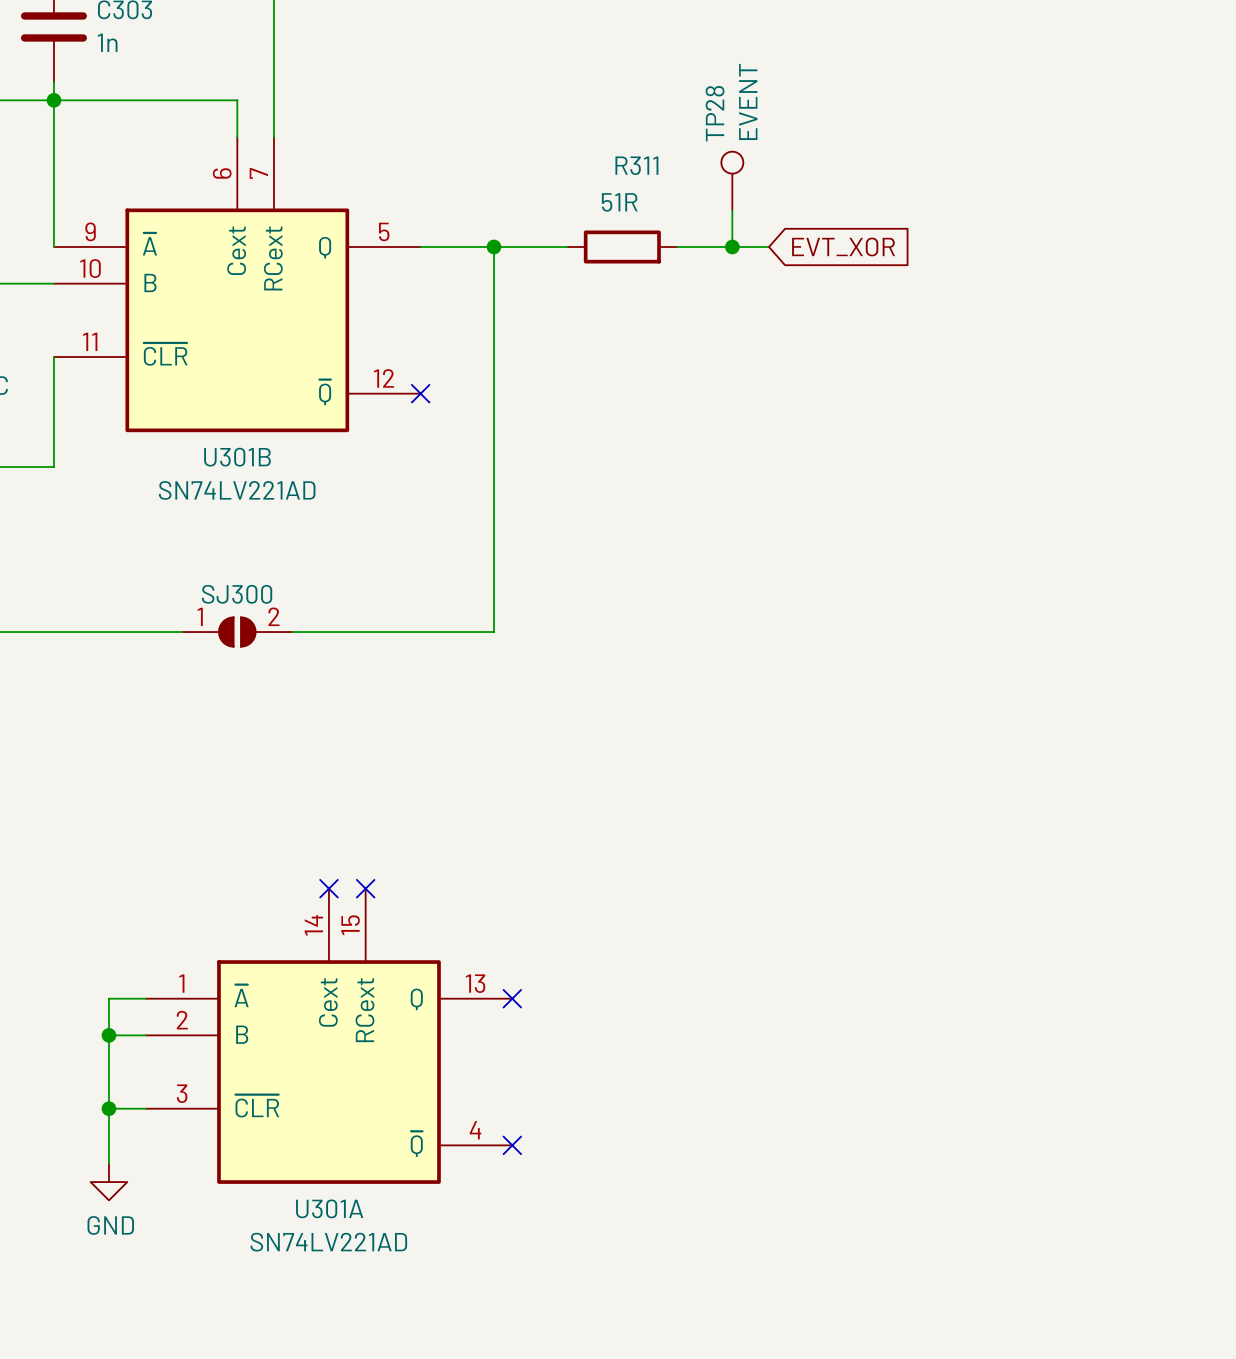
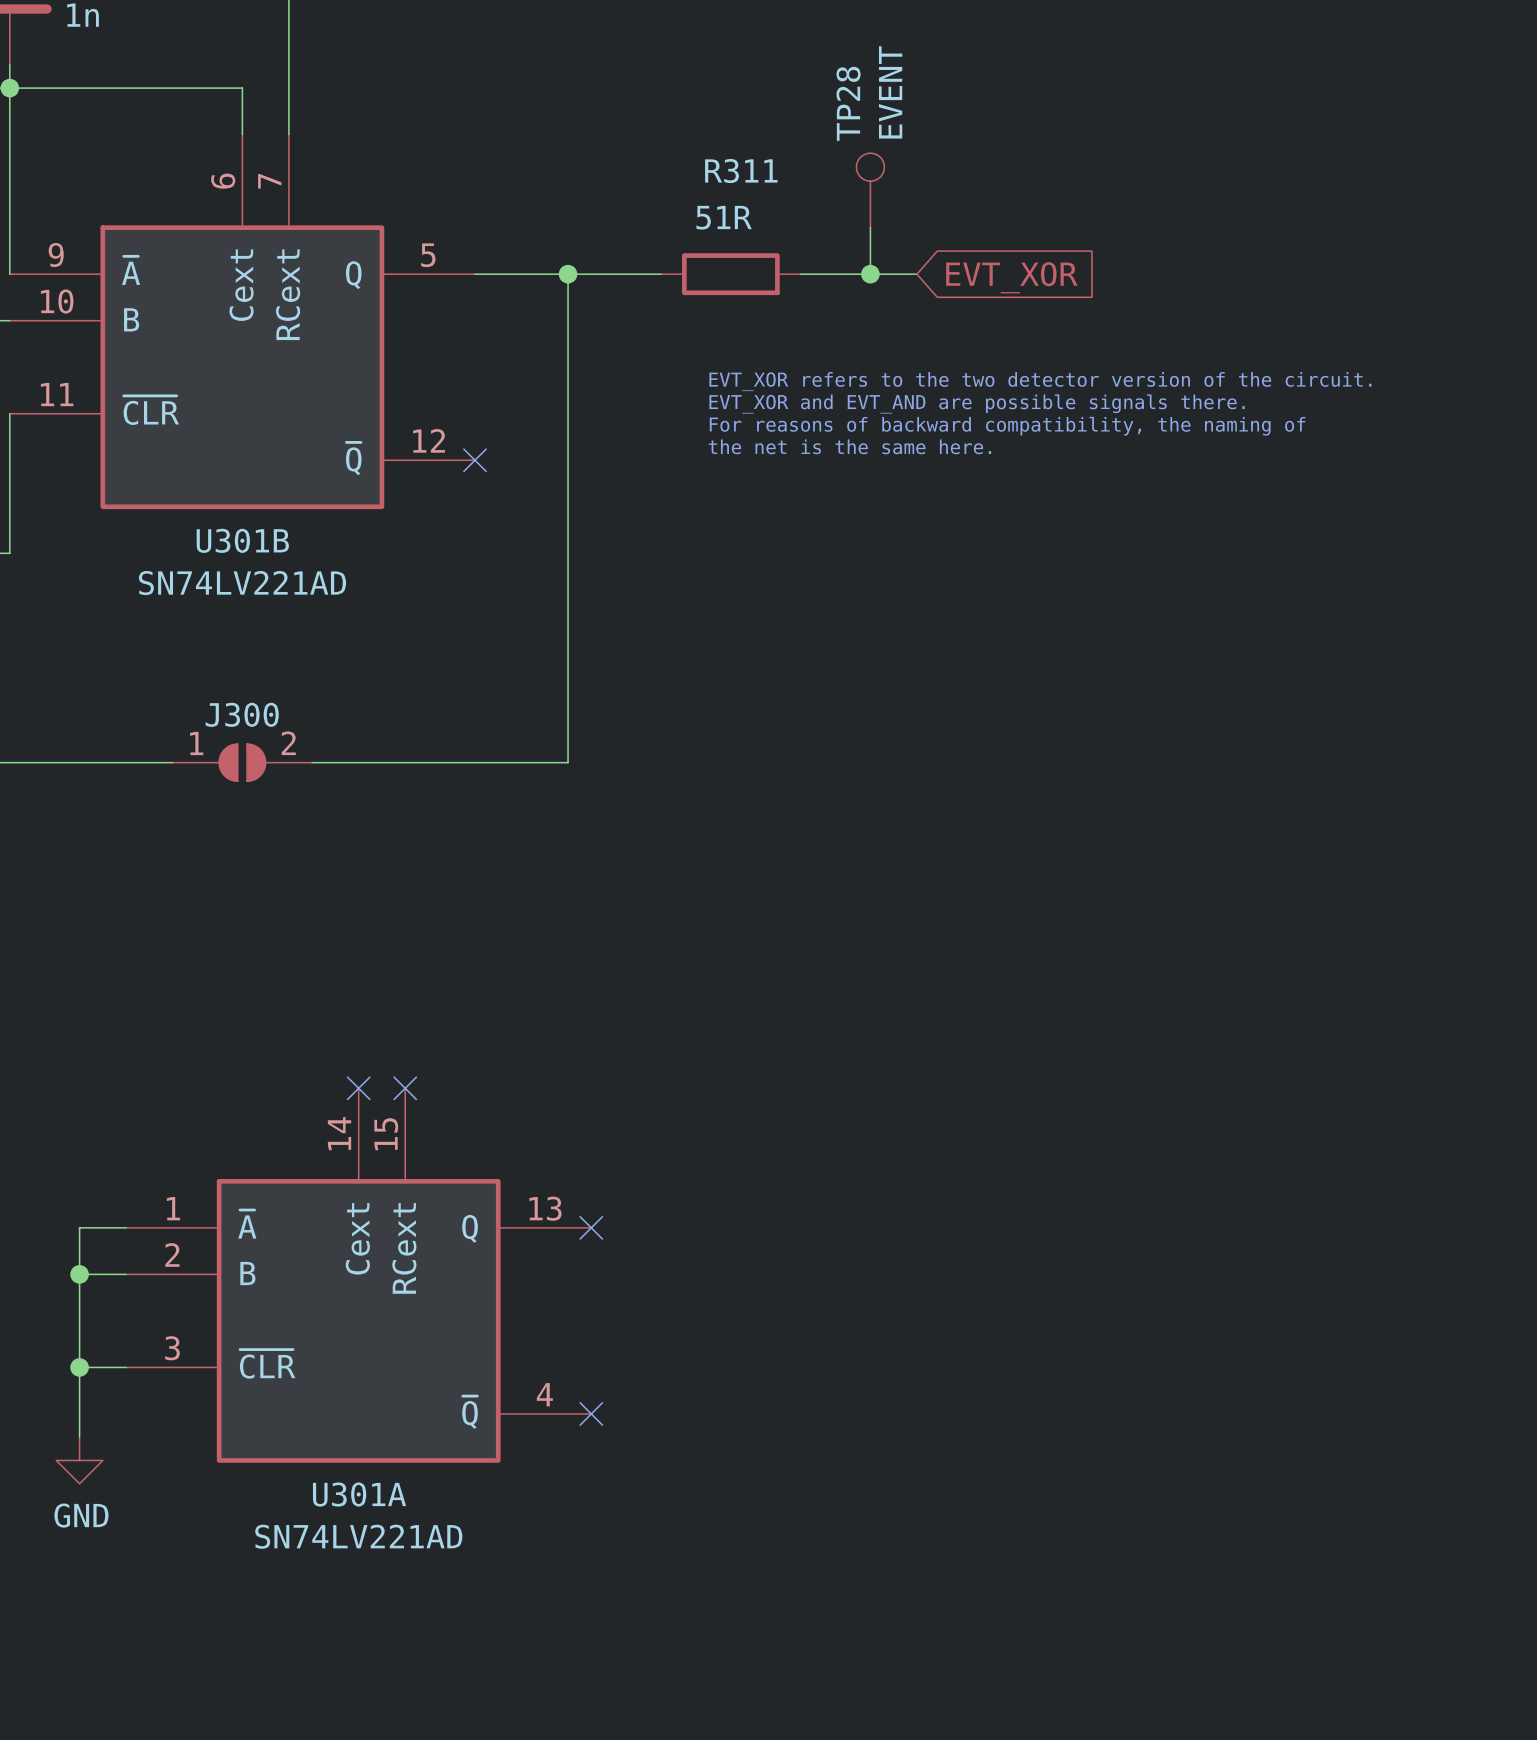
text: none -> EVT_XOR refers to the two detector version of the circuit. (1040, 381)
text: none -> EVT_XOR and EVT_AND are possible signals there. (977, 403)
text: none -> For reasons of backward compatibility, the naming of (1007, 426)
text: none -> the net is the same here. (849, 446)
SJ300 name: SJ300 (237, 594) -> J300 (242, 714)

